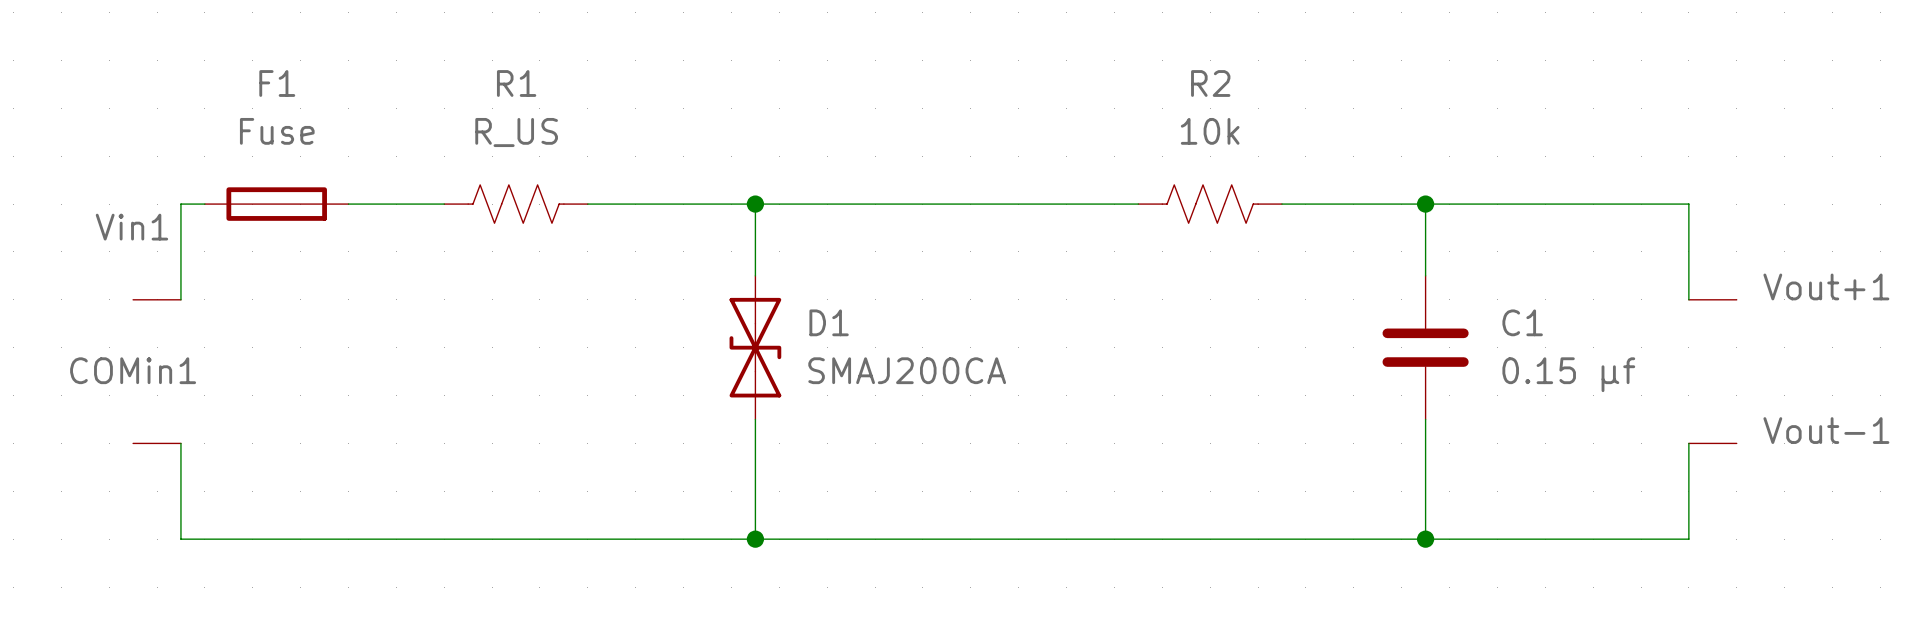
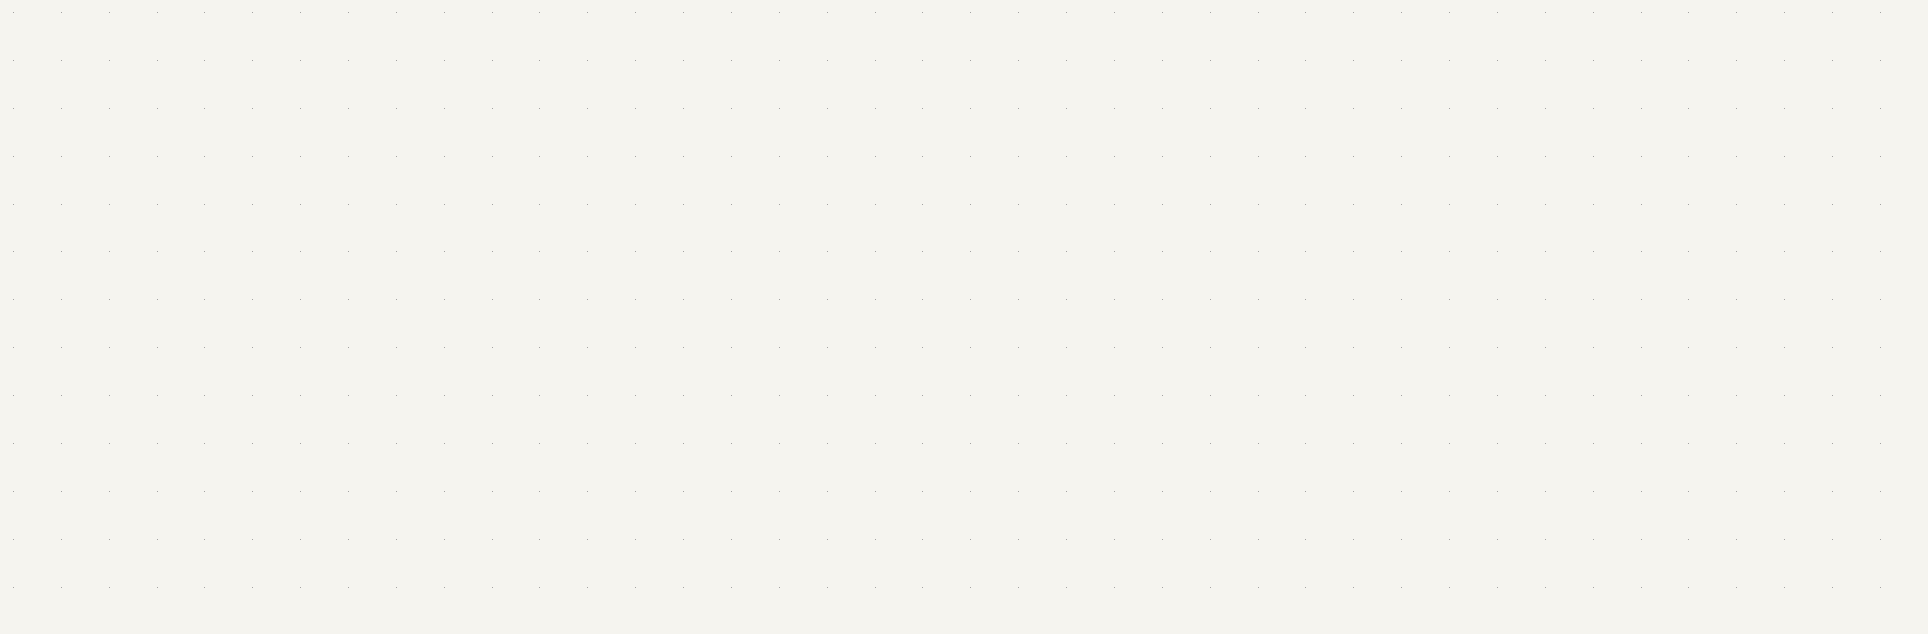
wire: (204, 204) (180, 204) (180, 299) -> none
F1: Fuse (276, 204) -> none
wire: (348, 204) (444, 204) -> none
R1: R_US (516, 204) -> none
wire: (587, 204) (1138, 204) -> none
wire: (755, 204) (755, 275) -> none
junction: (755, 204) -> none
R2: 10k (1210, 204) -> none
wire: (1281, 204) (1688, 204) (1688, 299) -> none
wire: (1425, 204) (1425, 275) -> none
junction: (1425, 204) -> none
Vin1: (157, 299) -> none
Vout+1: (1712, 299) -> none
D1: SMAJ200CA (755, 347) -> none
C1: 0.15 μf (1425, 347) -> none
wire: (755, 419) (755, 539) -> none
wire: (1425, 419) (1425, 539) -> none
COMin1: (157, 443) -> none
wire: (180, 443) (180, 539) (1688, 539) (1688, 443) -> none
Vout-1: (1712, 443) -> none
junction: (755, 539) -> none
junction: (1425, 539) -> none

